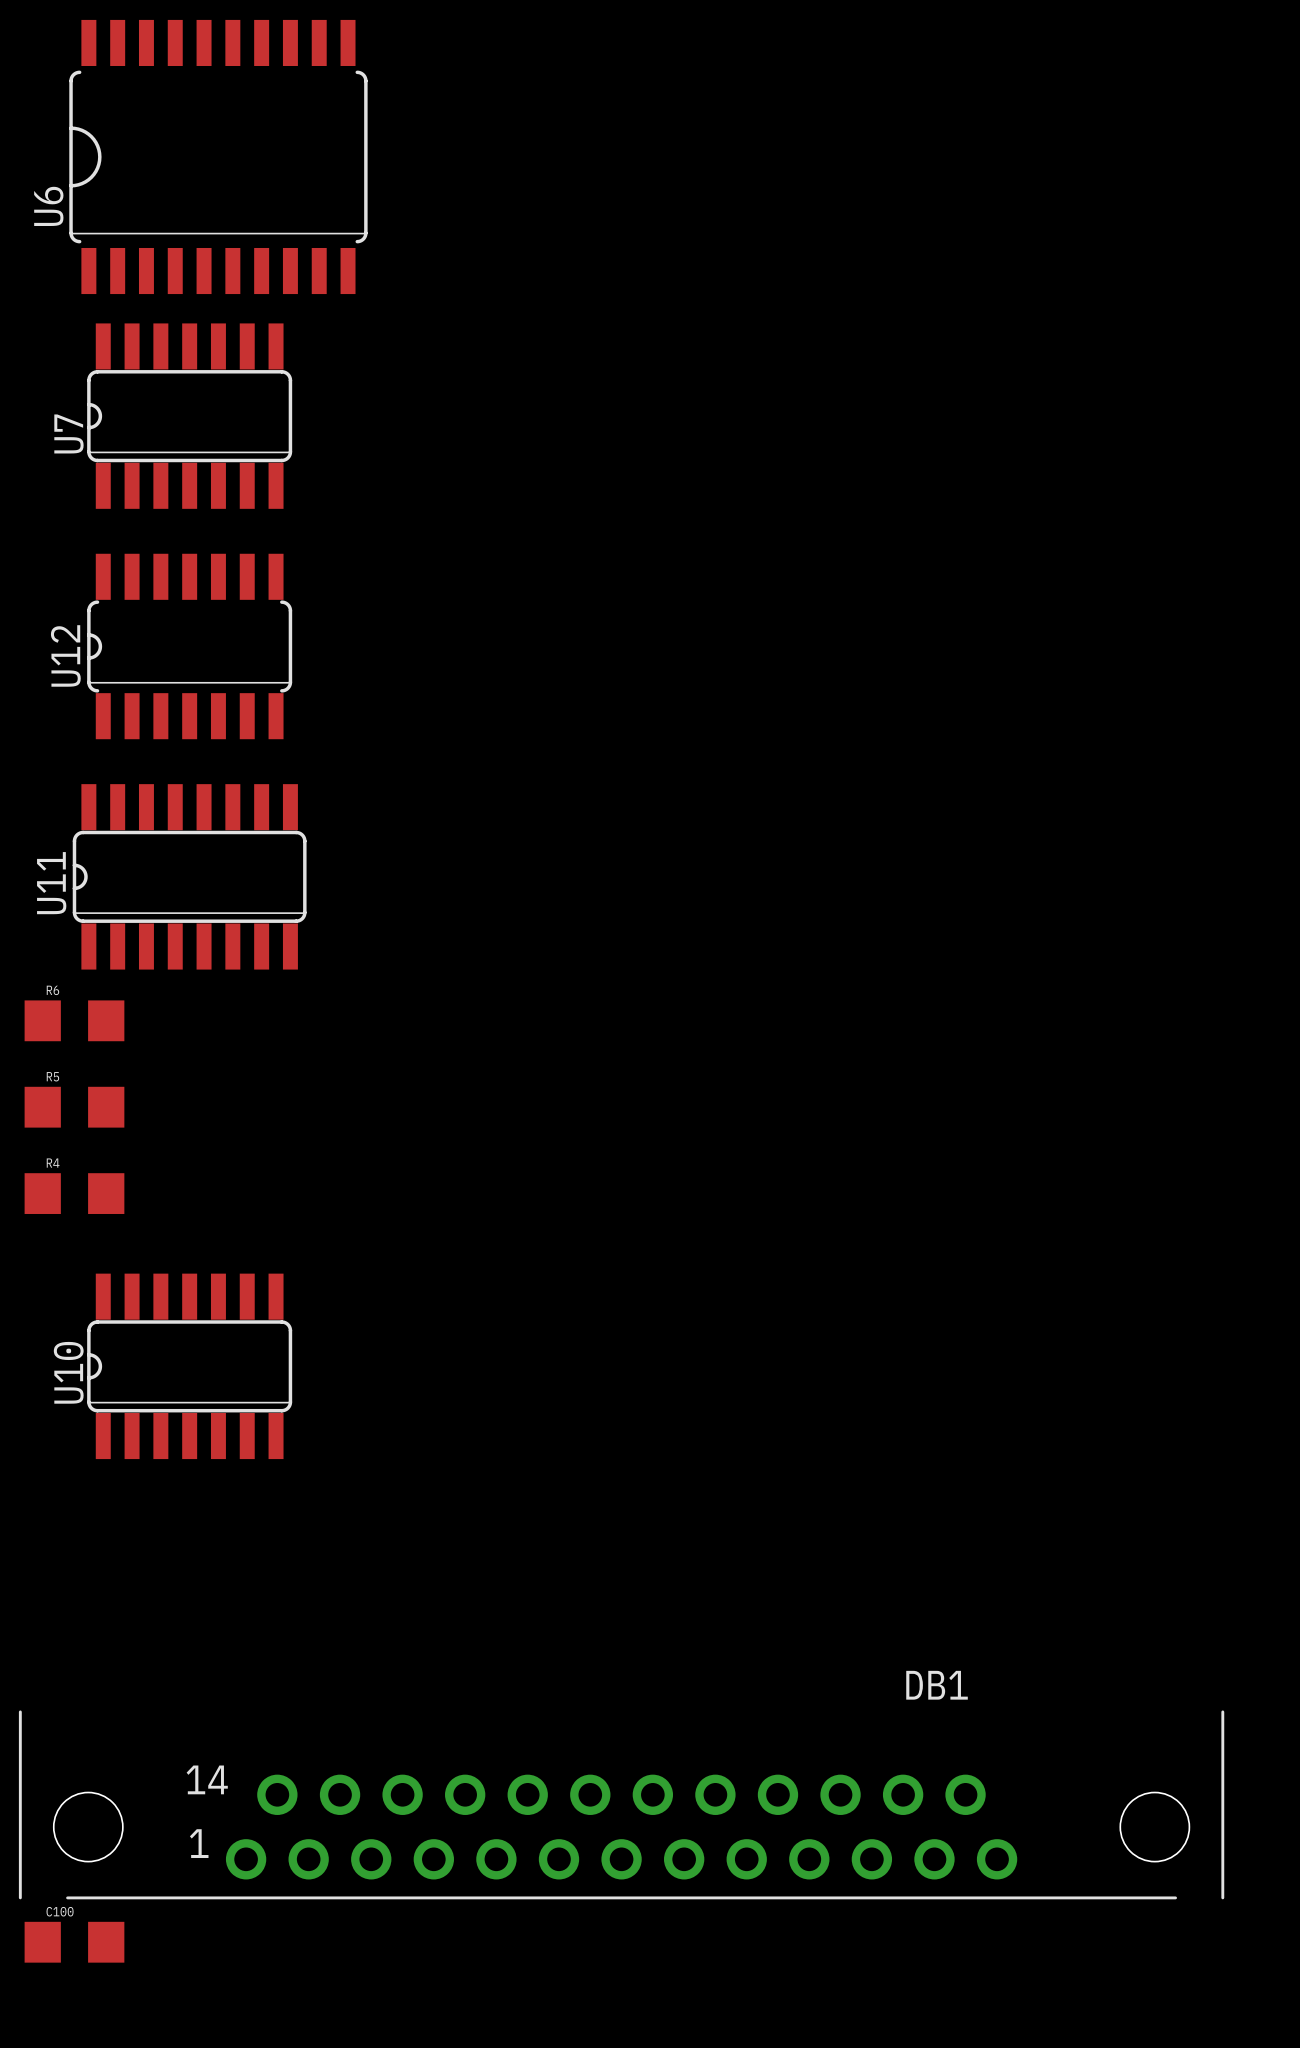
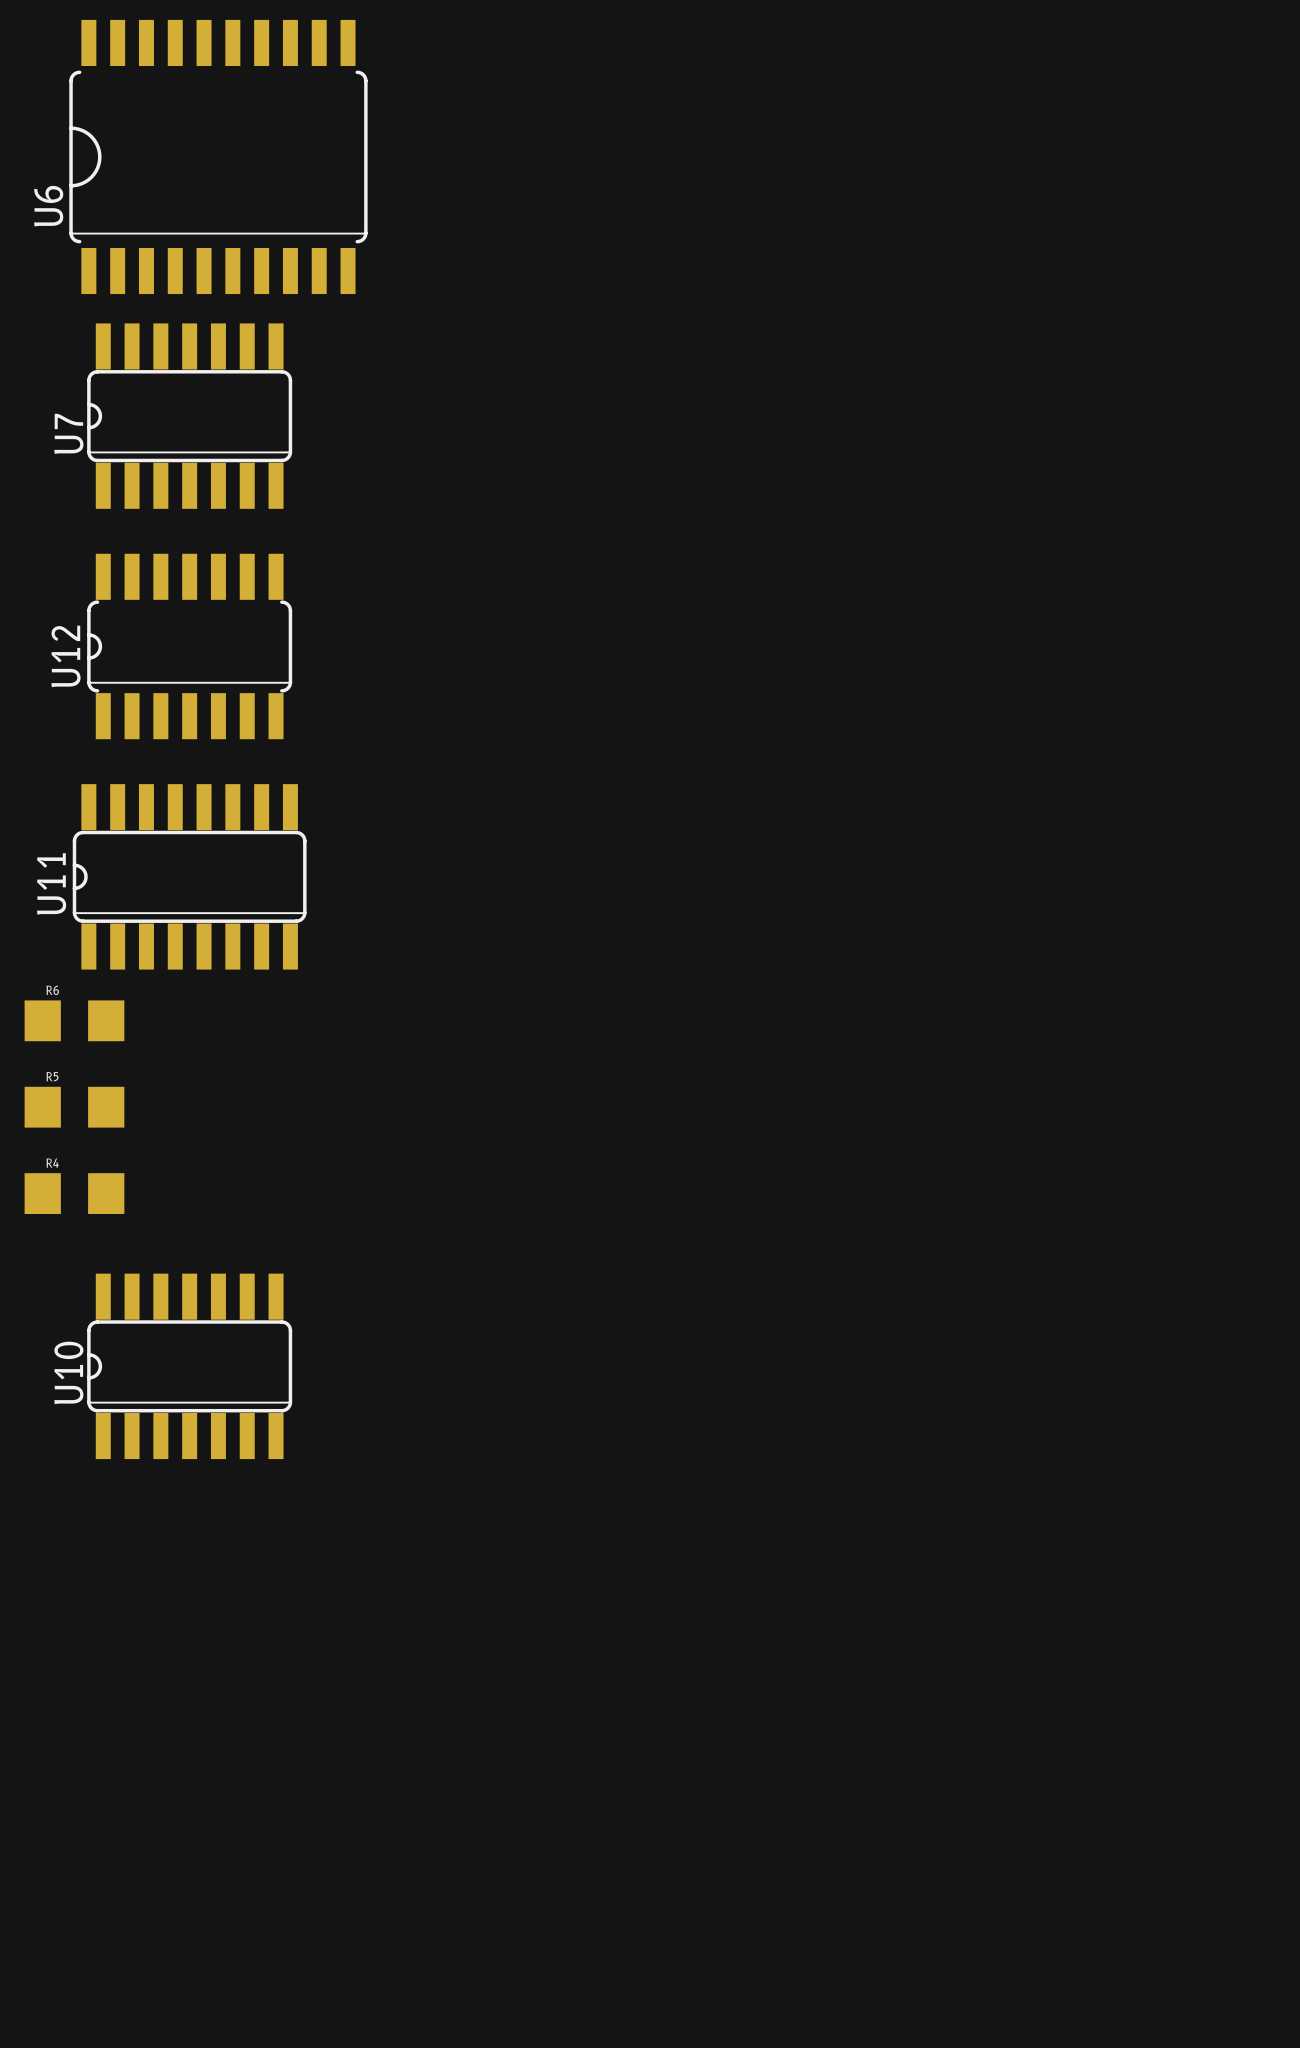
DB1: (621, 1804) -> none
C100: (74, 1942) -> none

